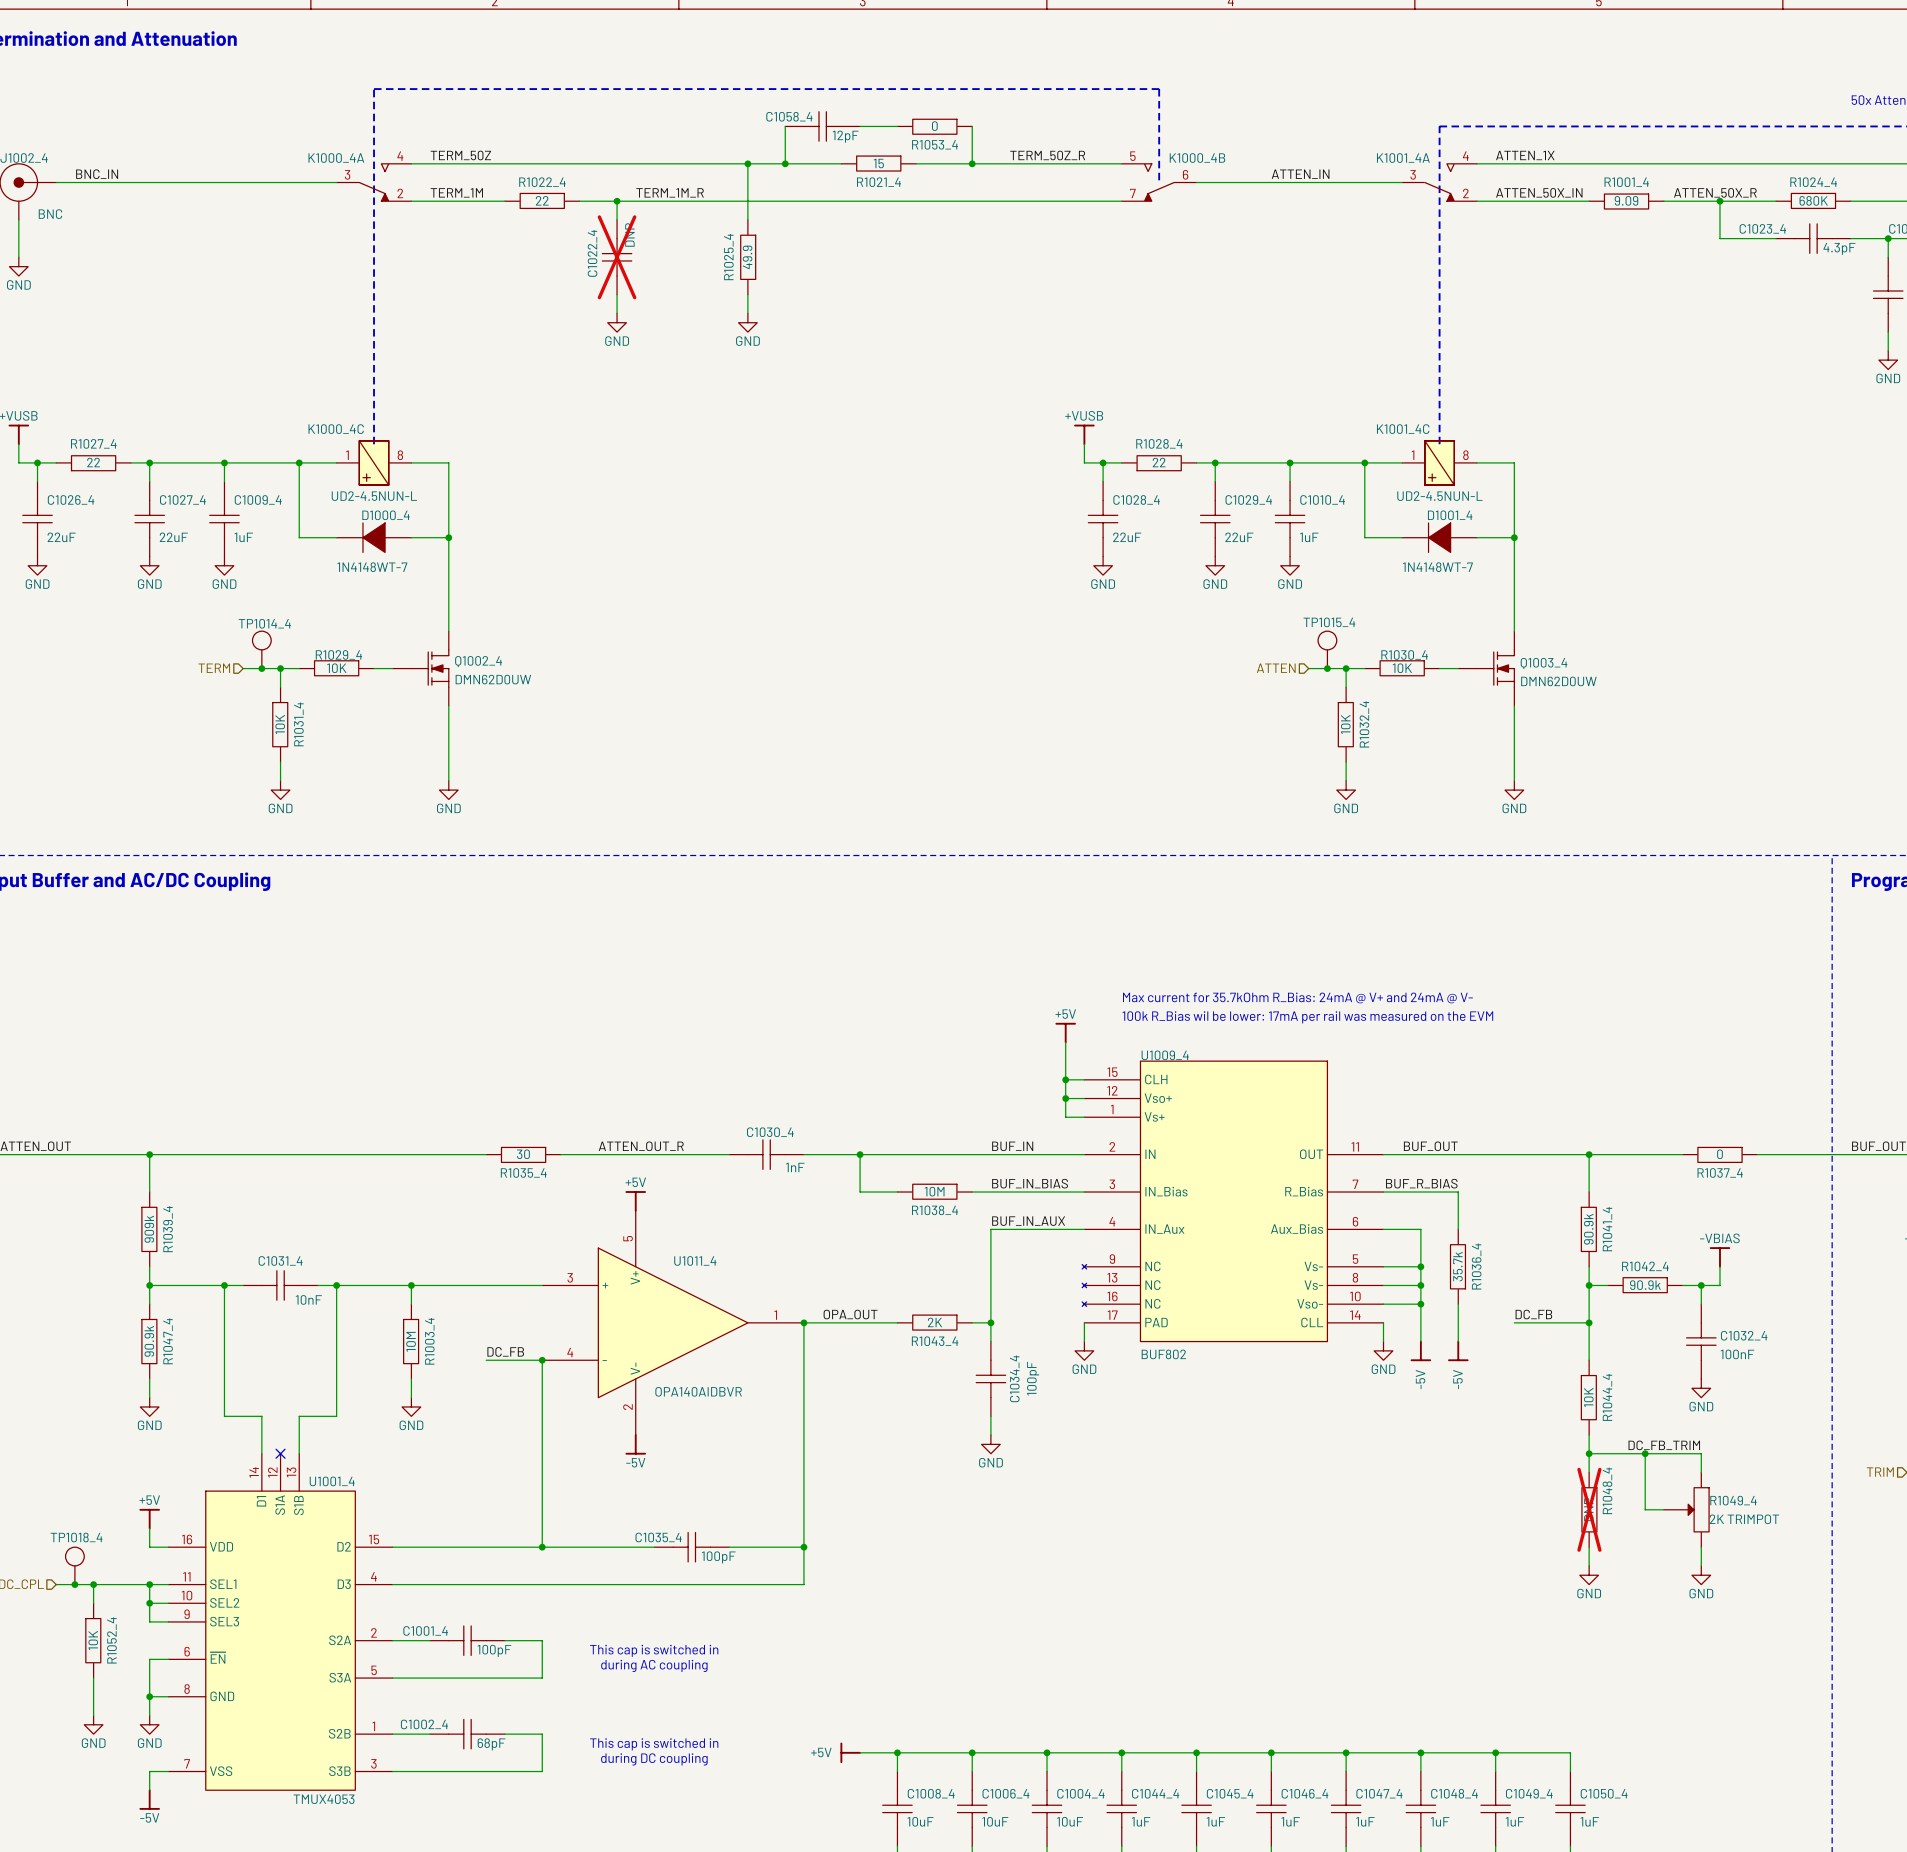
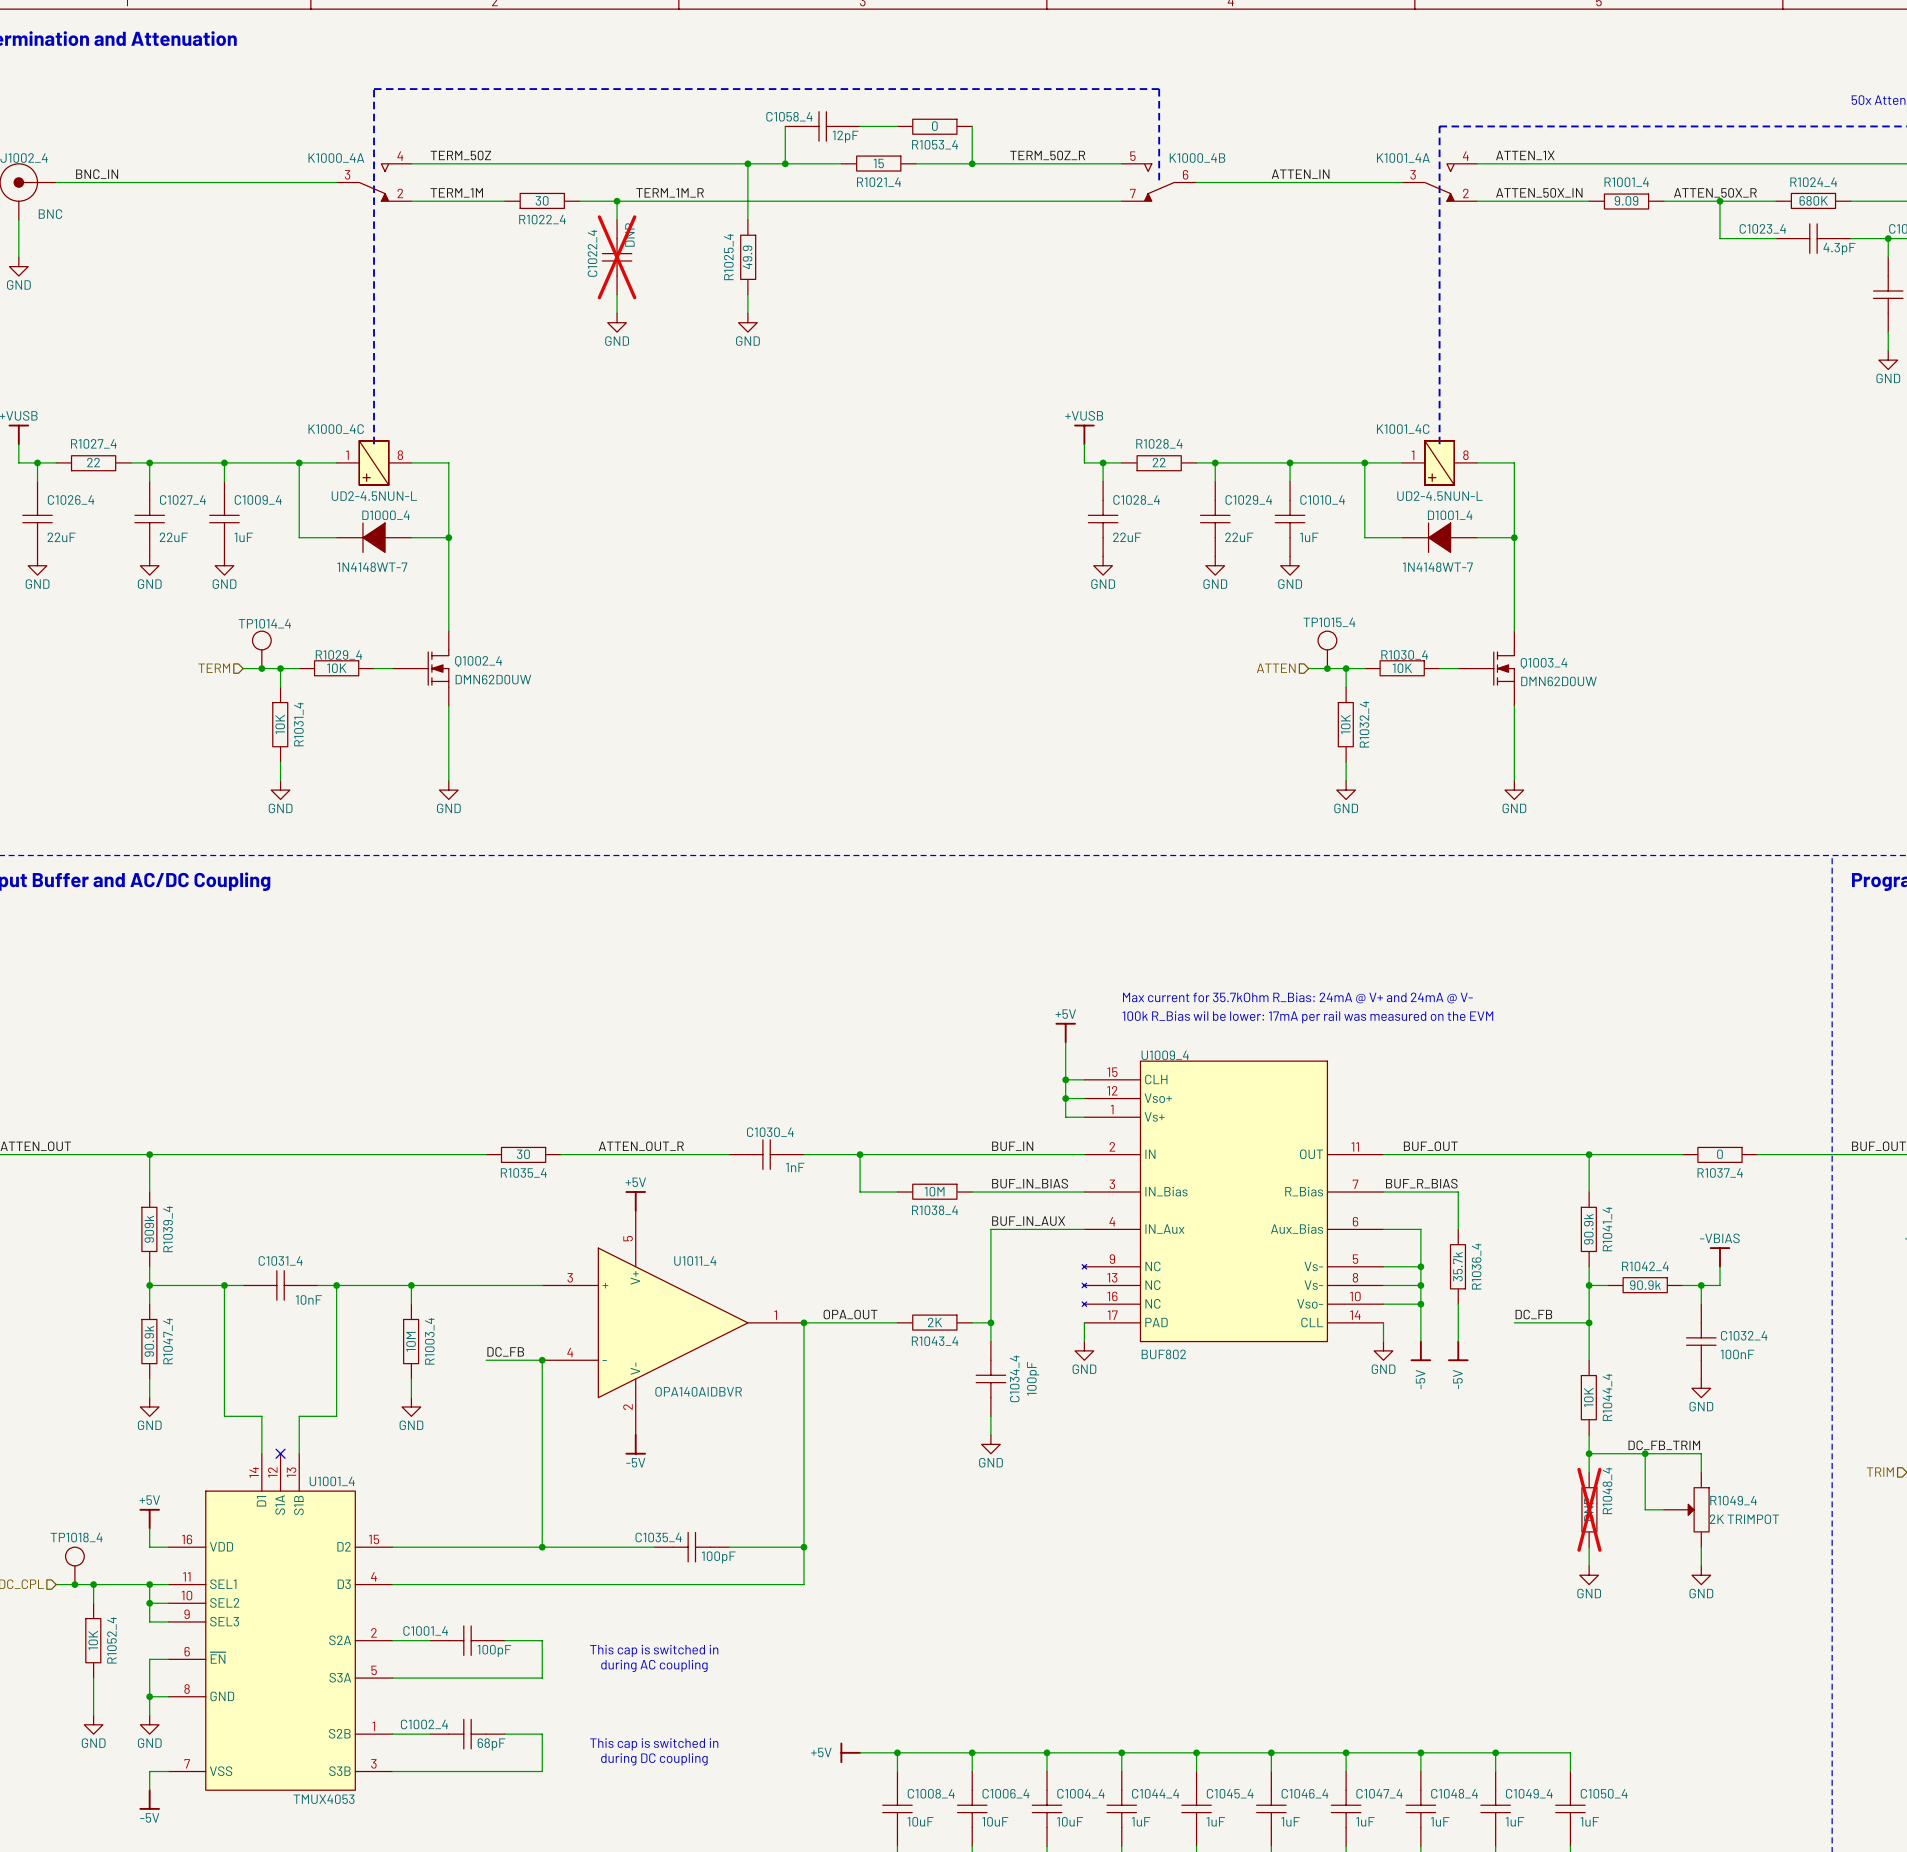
R1022_4 name position: R1022_4 (542, 182) -> R1022_4 (542, 219)
R1022_4 value: 22 (542, 200) -> 30 (542, 200)

